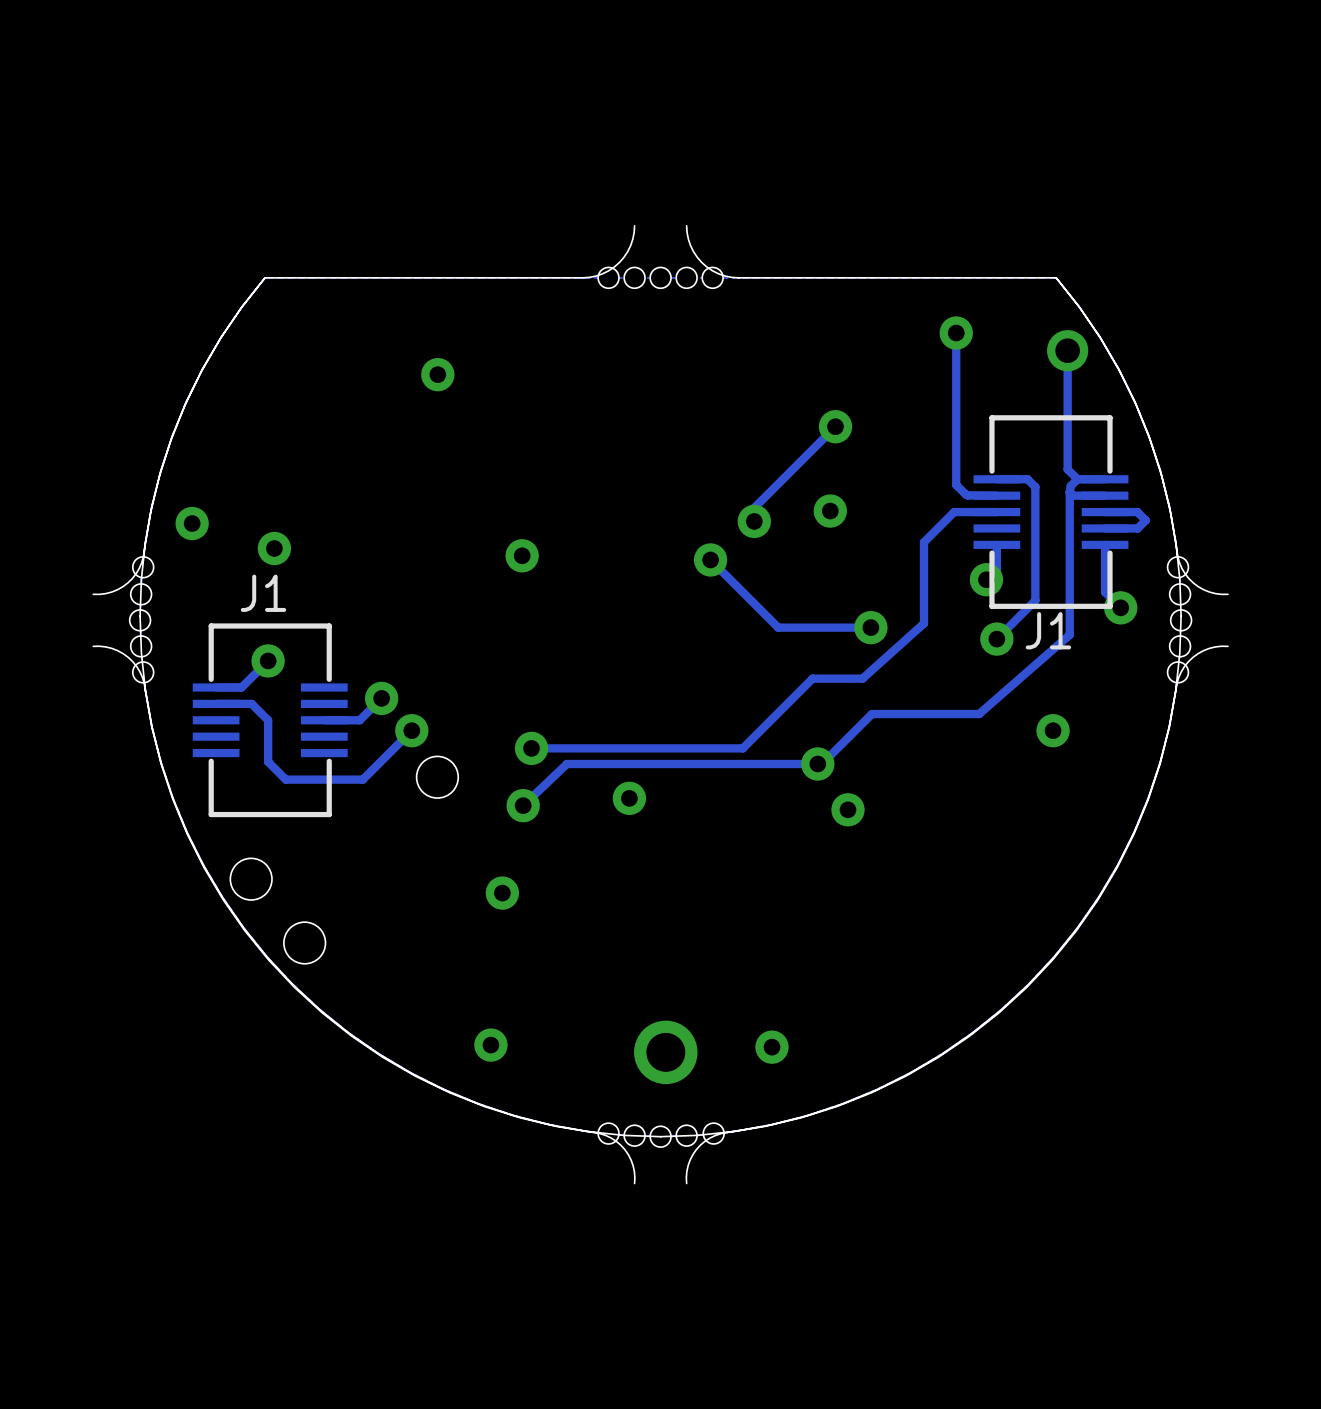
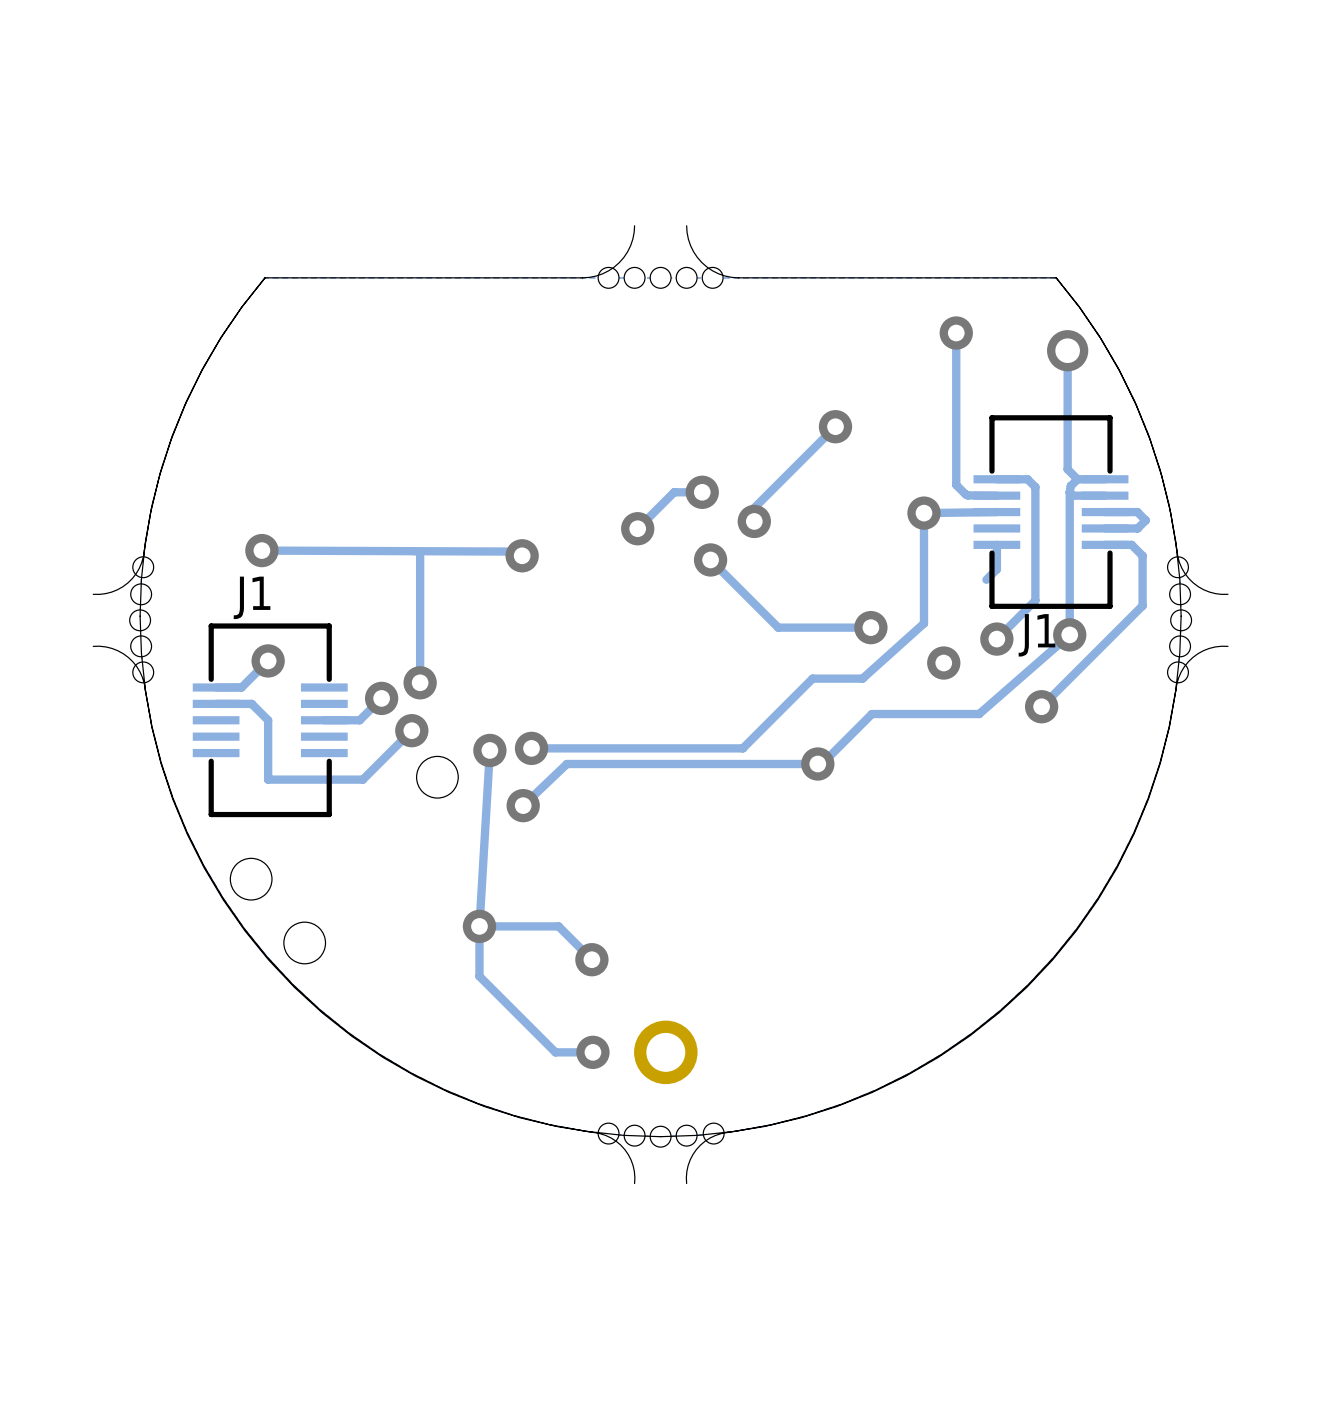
via: (437, 374) -> none
track: none -> (702, 492) (674, 492) (637, 528)
via: none -> (702, 492)
via: (830, 511) -> none
track: (996, 512) (954, 512) (923, 542) -> (996, 512) (923, 513) (923, 542)
via: none -> (923, 513)
via: (192, 523) -> none
via: none -> (637, 528)
track: (1105, 544) (1105, 592) (1120, 607) -> (1105, 544) (1131, 544) (1142, 555) (1142, 605) (1041, 706)
via position: (274, 548) -> (261, 550)
track: none -> (261, 550) (526, 551)
track: none -> (420, 556) (420, 682)
via: (986, 579) -> none
via: (1120, 607) -> none
via: none -> (1069, 634)
via: none -> (943, 663)
via: none -> (420, 682)
via position: (1053, 730) -> (1041, 706)
track: none -> (489, 750) (479, 926)
via: none -> (489, 750)
track: (268, 761) (285, 779) -> (268, 761) (268, 779) (285, 779)
via: (629, 798) -> none
via: (847, 809) -> none
via position: (502, 893) -> (479, 926)
track: none -> (479, 926) (479, 976) (555, 1052) (592, 1052)
track: none -> (479, 926) (558, 926) (591, 959)
via: none -> (591, 959)
via: (490, 1045) -> none
via: (772, 1047) -> none
via: none -> (592, 1052)

